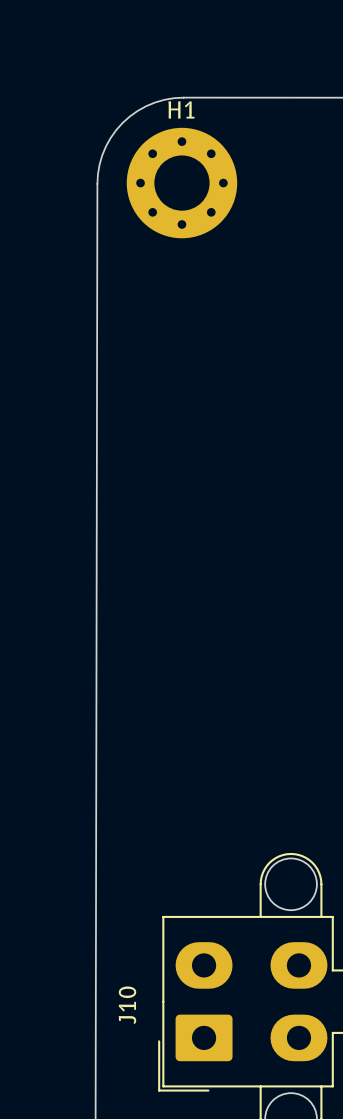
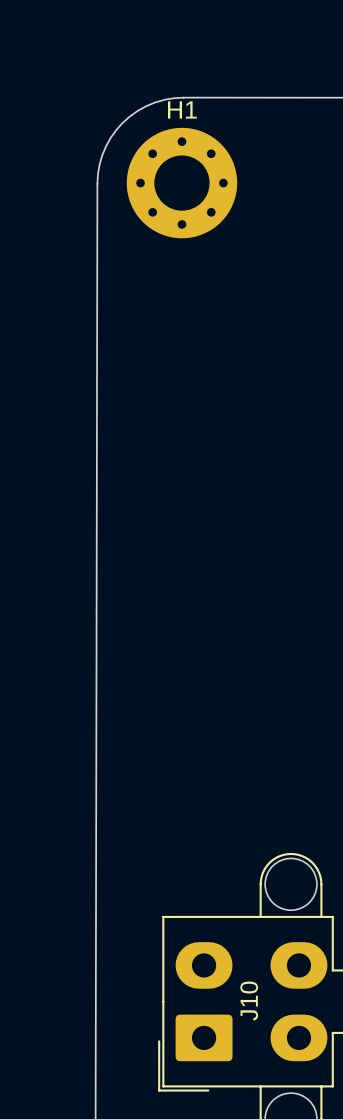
J10 name position: J10 (127, 1005) -> J10 (249, 1001)

